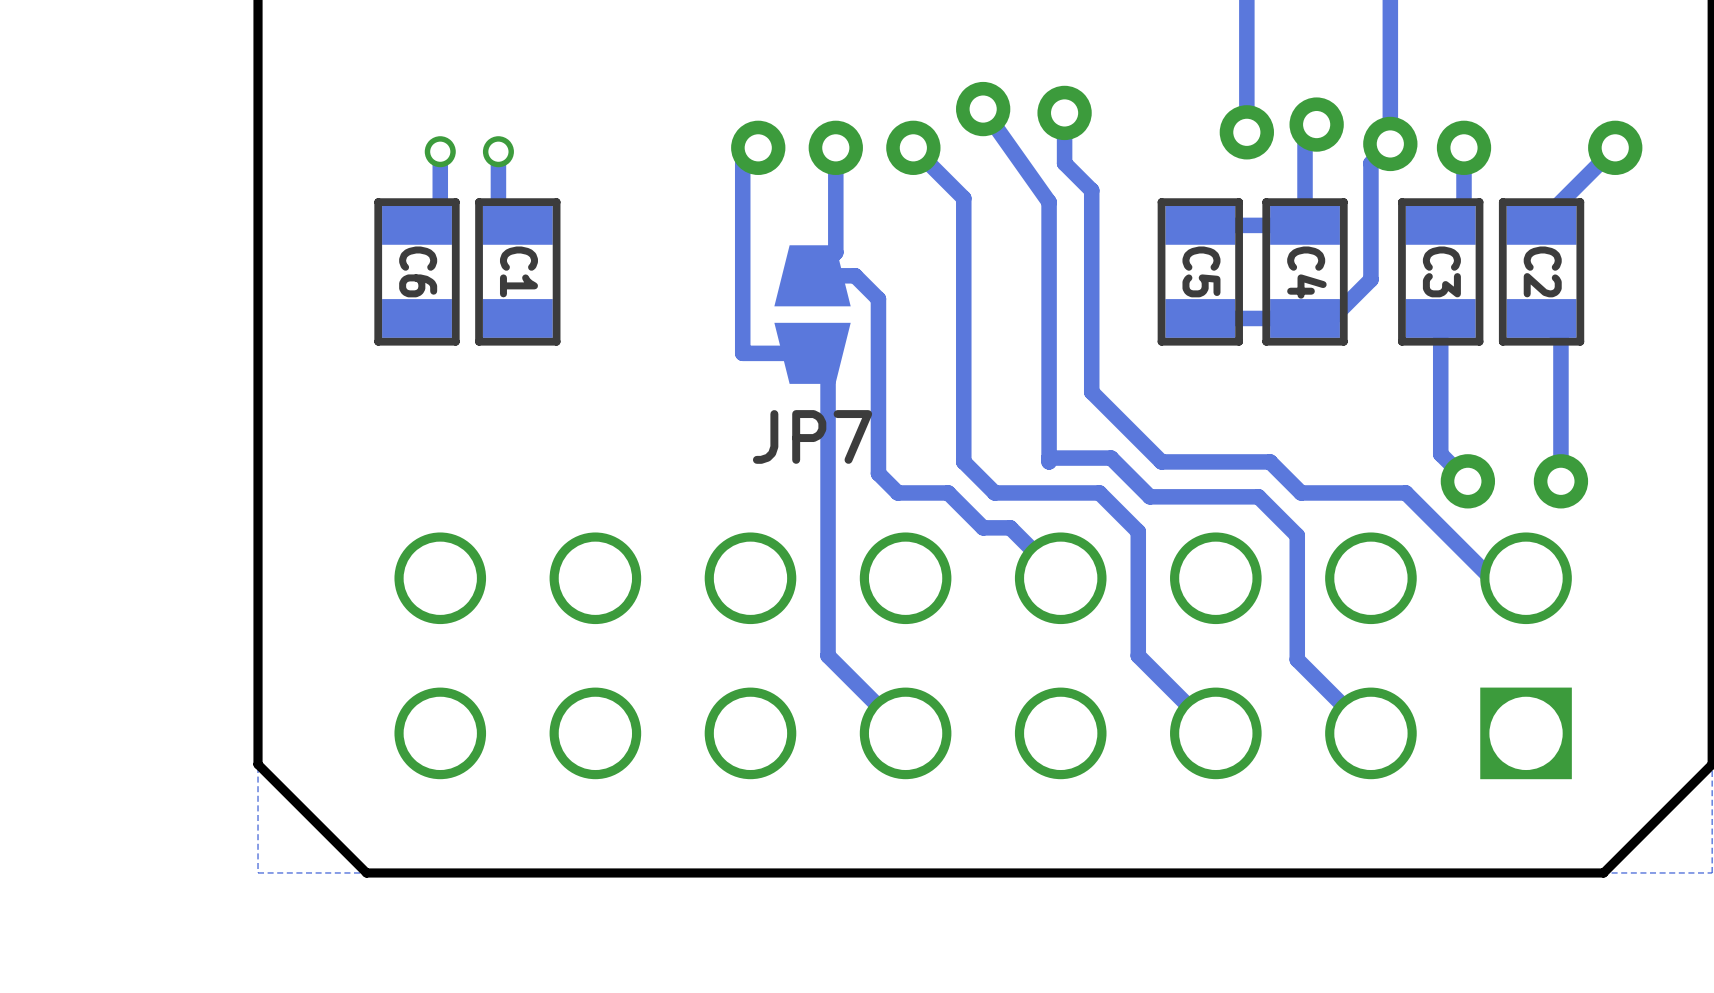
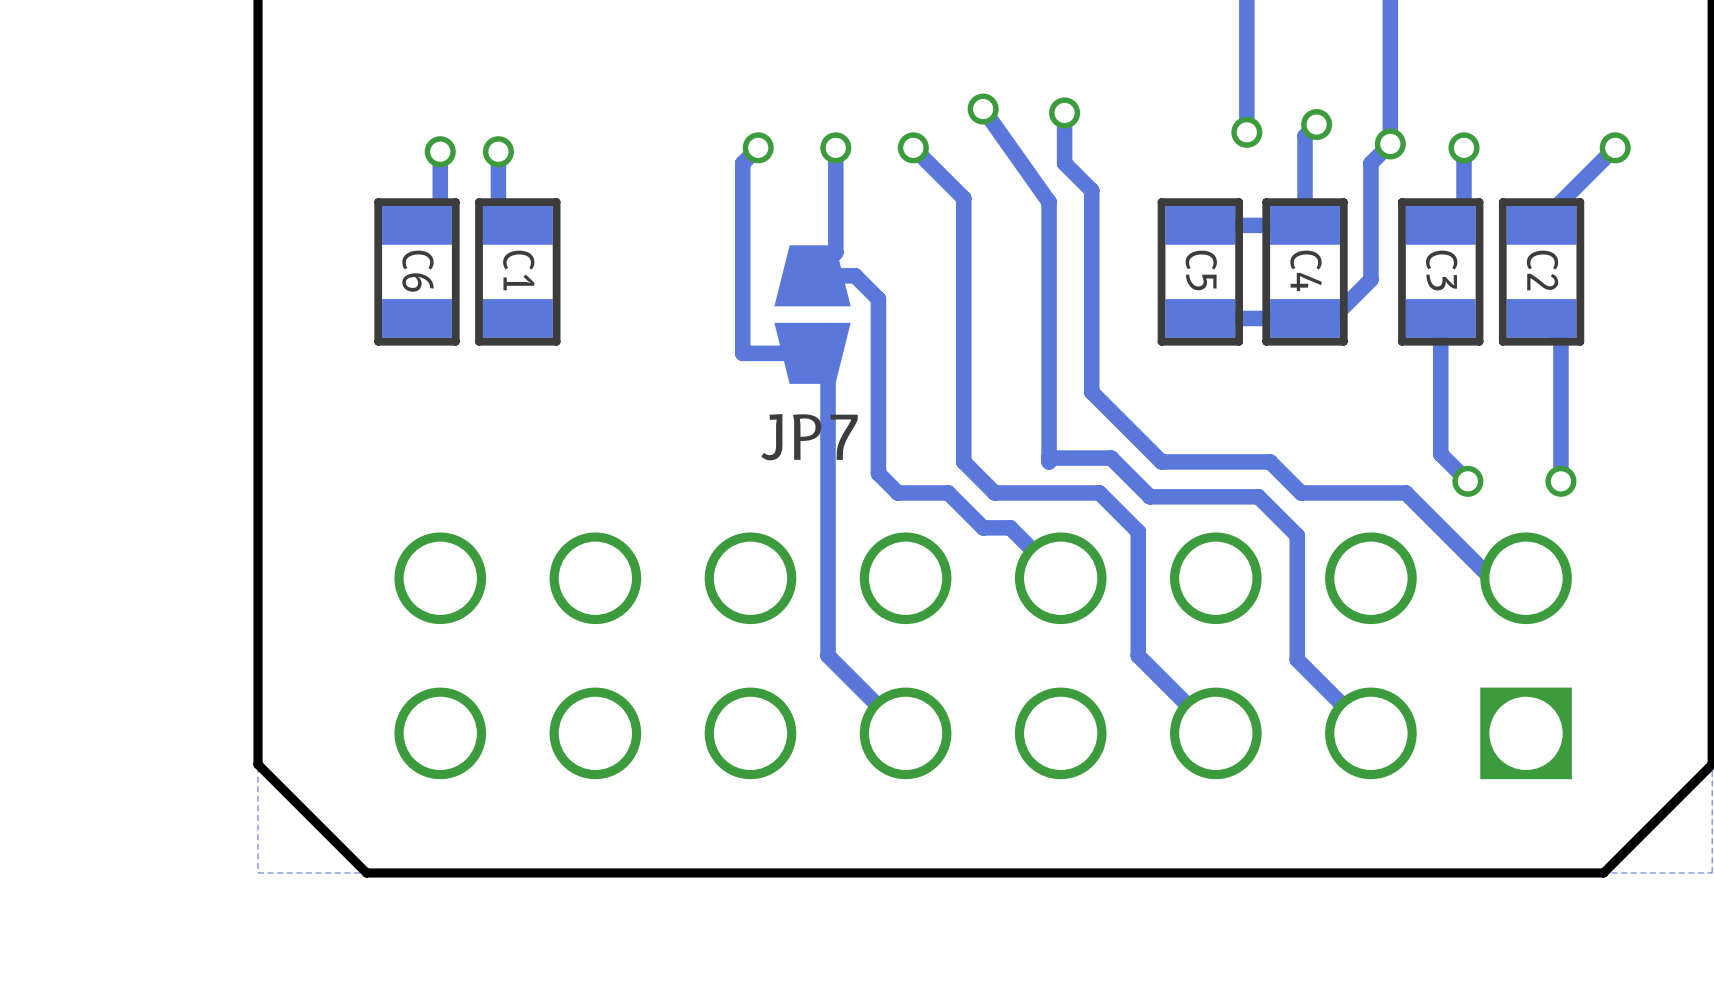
via size: [956, 81, 1011, 137] -> [967, 93, 999, 125]
via size: [1037, 85, 1092, 141] -> [1049, 97, 1081, 129]
via size: [1289, 97, 1344, 152] -> [1301, 109, 1333, 141]
via size: [1219, 105, 1274, 160] -> [1231, 116, 1263, 148]
via size: [1363, 116, 1418, 172] -> [1374, 128, 1406, 160]
via size: [731, 120, 786, 175] -> [742, 132, 774, 164]
via size: [808, 120, 863, 175] -> [820, 132, 852, 164]
via size: [886, 120, 941, 175] -> [897, 132, 929, 164]
via size: [1436, 120, 1492, 175] -> [1448, 132, 1480, 164]
via size: [1588, 120, 1643, 175] -> [1599, 132, 1631, 164]
via size: [1440, 454, 1496, 509] -> [1452, 465, 1484, 497]
via size: [1533, 454, 1589, 509] -> [1545, 465, 1577, 497]

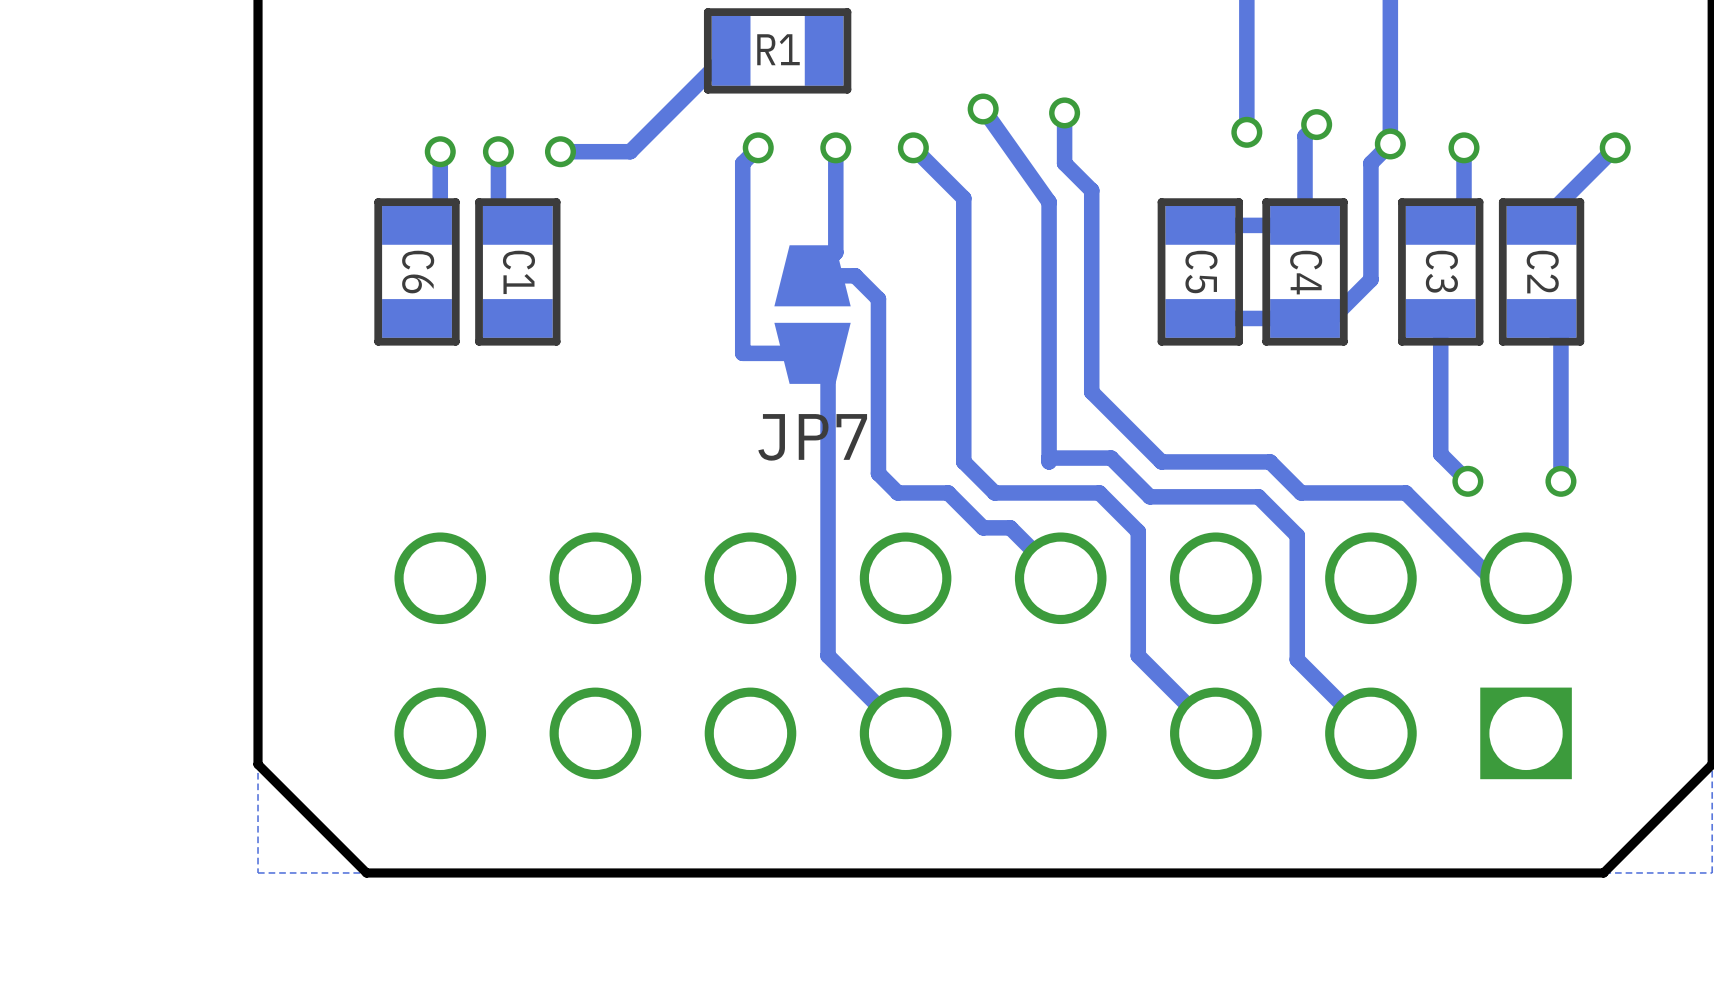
track: none -> (731, 50) (630, 151) (560, 151)
R1: none -> (777, 50)
via: none -> (560, 151)

